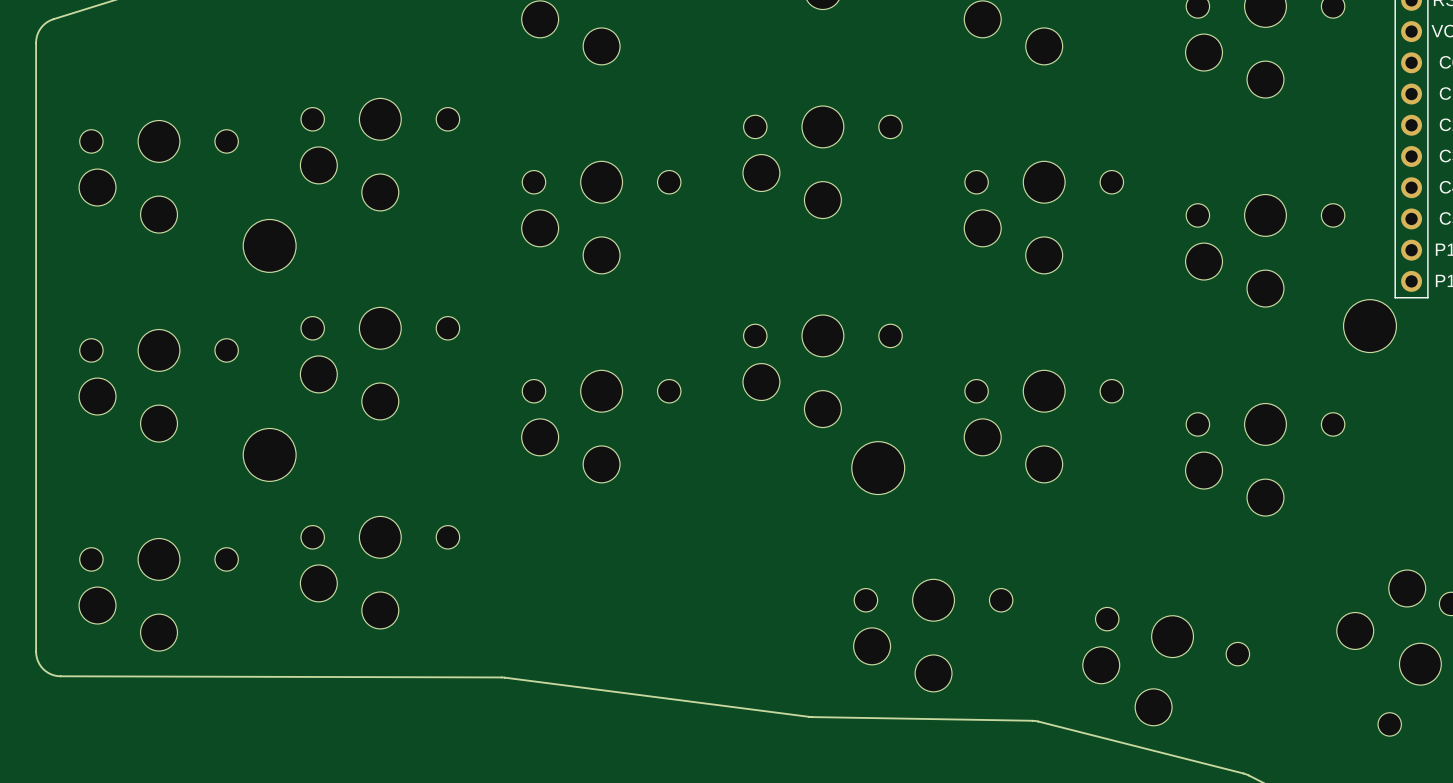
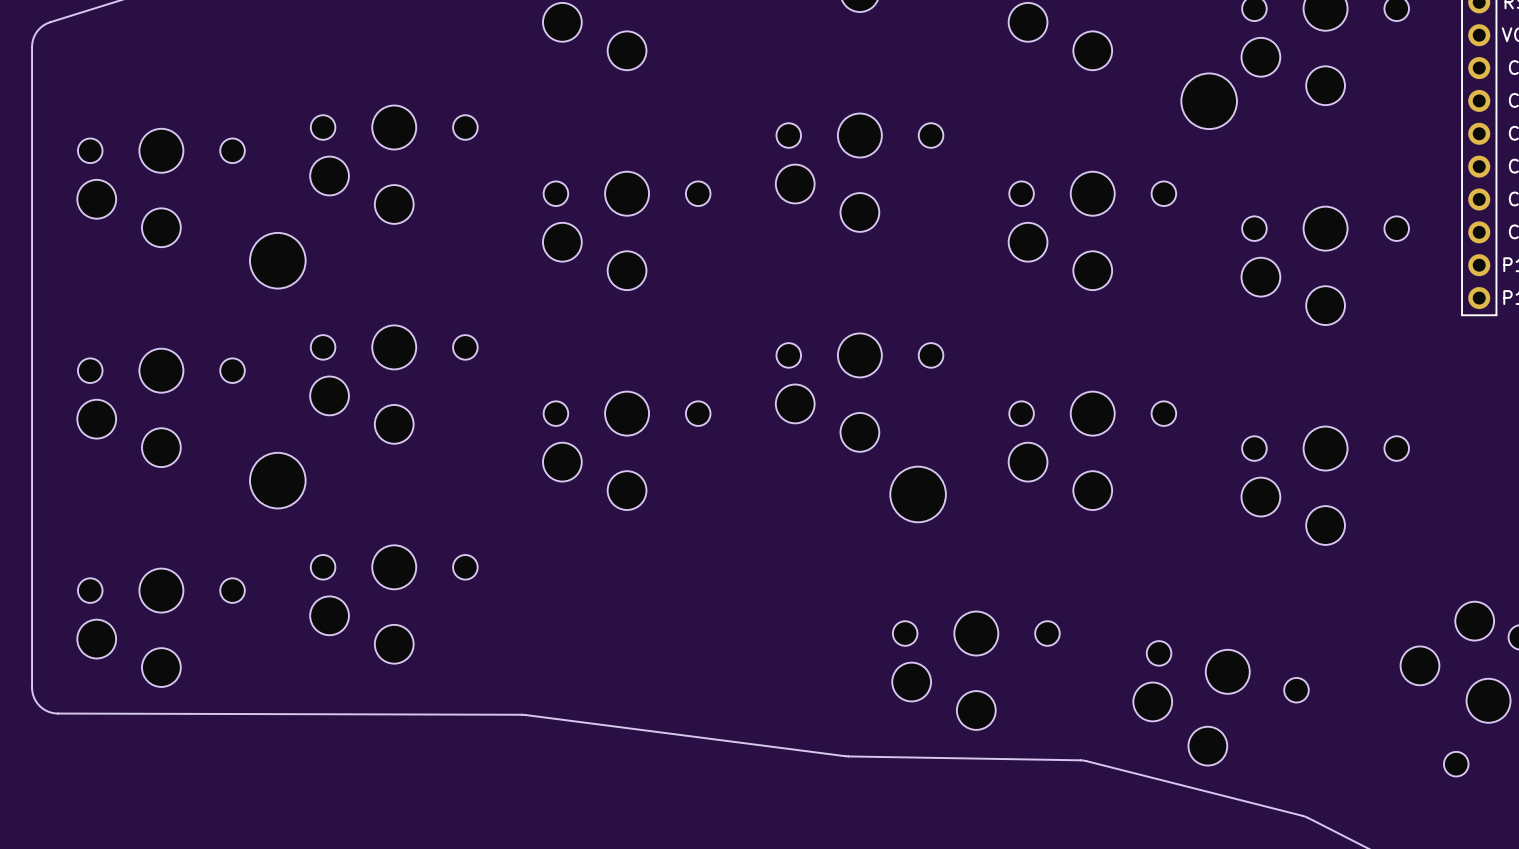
part: none -> (1209, 101)
part: (1370, 326) -> none

